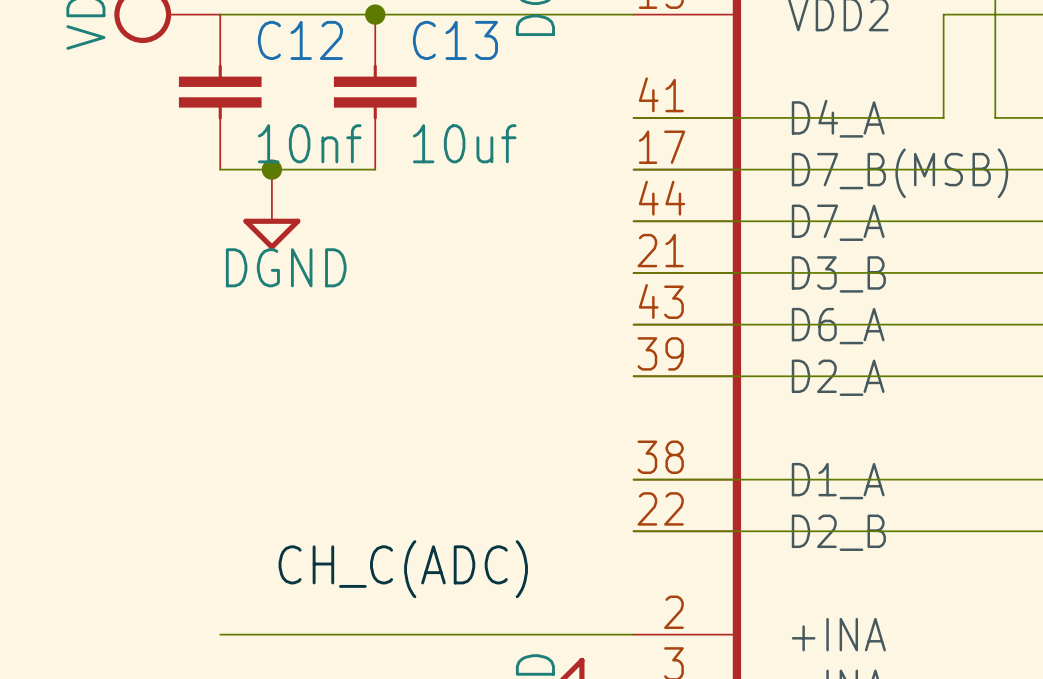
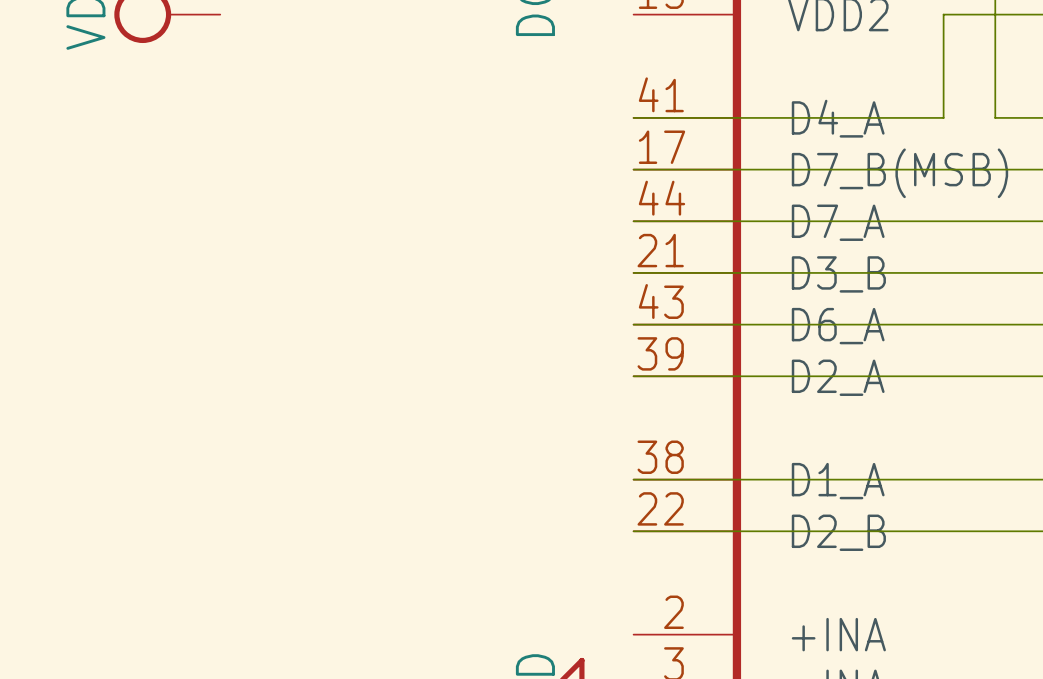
wire: (220, 14) (633, 14) -> none
junction: (375, 14) -> none
C12: 10nf (220, 92) -> none
C13: 10uf (375, 92) -> none
wire: (220, 169) (375, 169) -> none
junction: (271, 169) -> none
power symbol: DGND (271, 209) -> none
label: CH_C(ADC) (403, 569) -> none
wire: (220, 634) (633, 634) -> none

